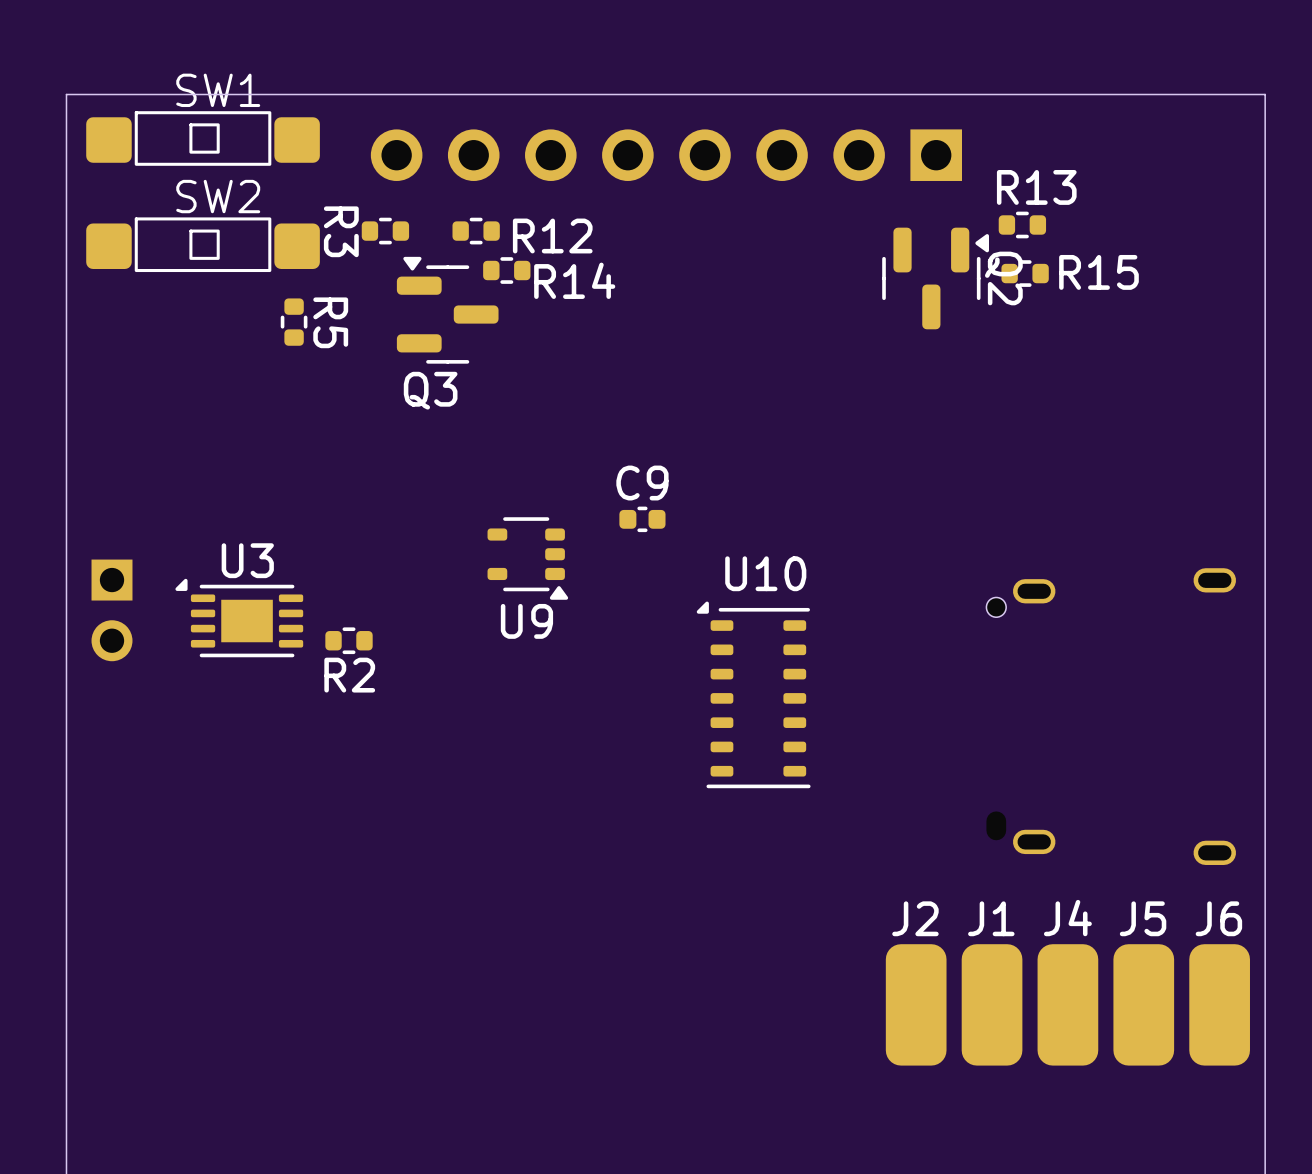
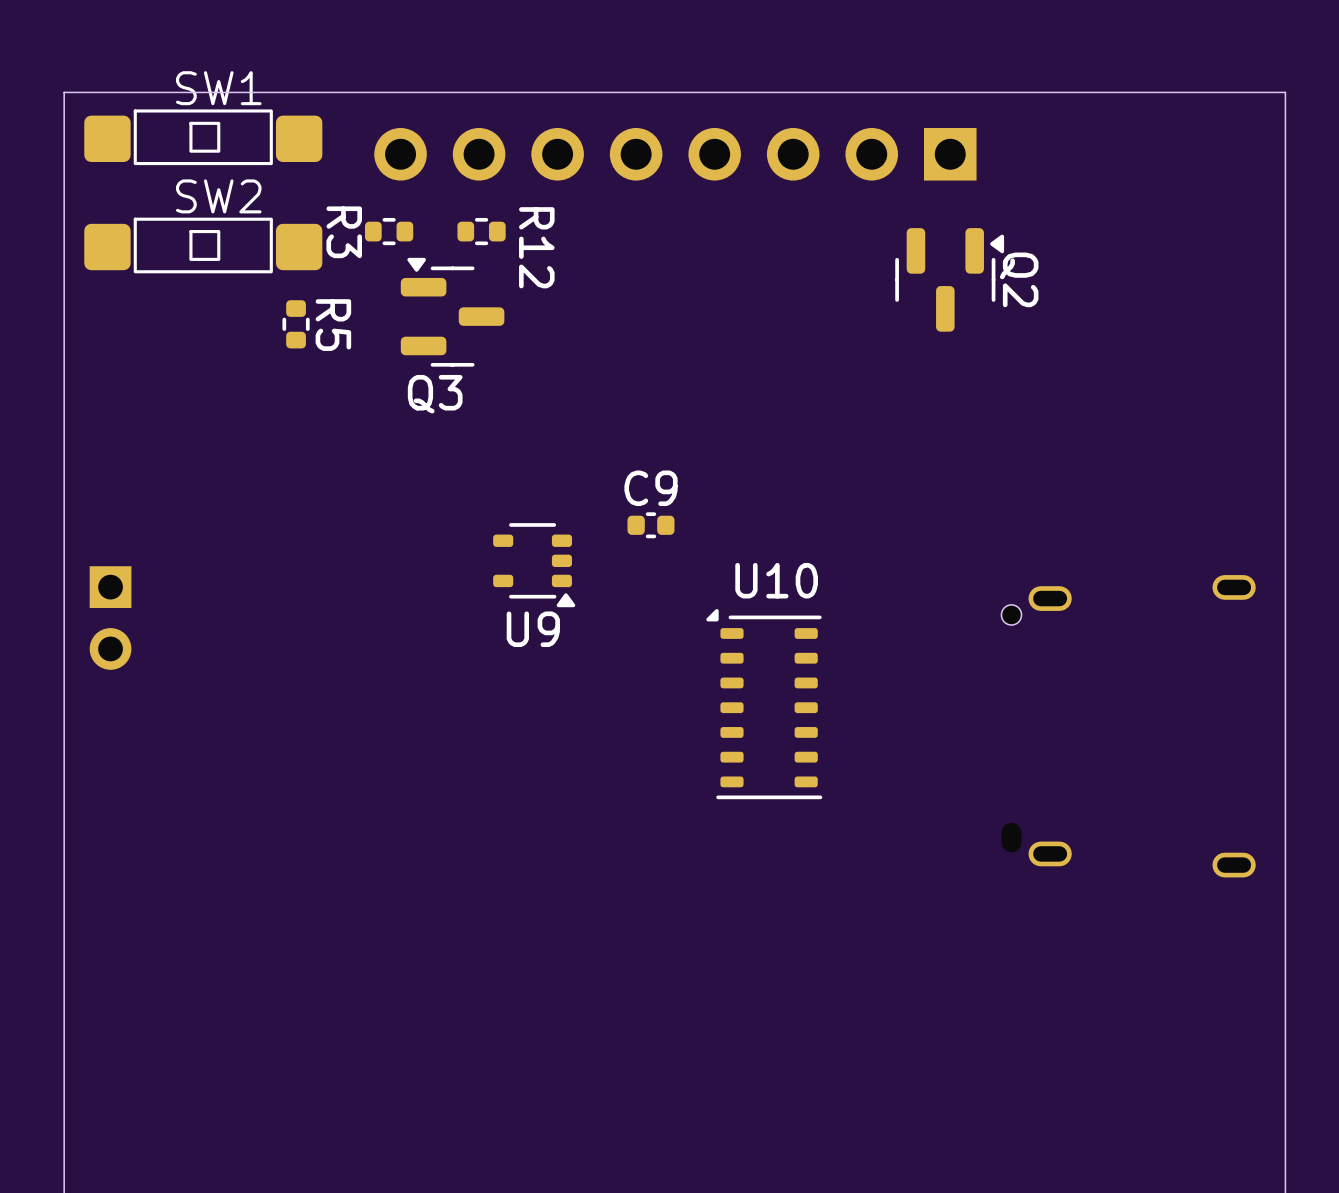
R13: (1022, 224) -> none
R12 name rotation: 0° (552, 235) -> 90° clockwise (536, 247)
R14: (506, 270) -> none
R15: (1025, 273) -> none
U3: (239, 618) -> none
R2: (349, 640) -> none
J2: (916, 1004) -> none
J1: (992, 1004) -> none
J4: (1067, 1004) -> none
J5: (1143, 1004) -> none
J6: (1219, 1004) -> none

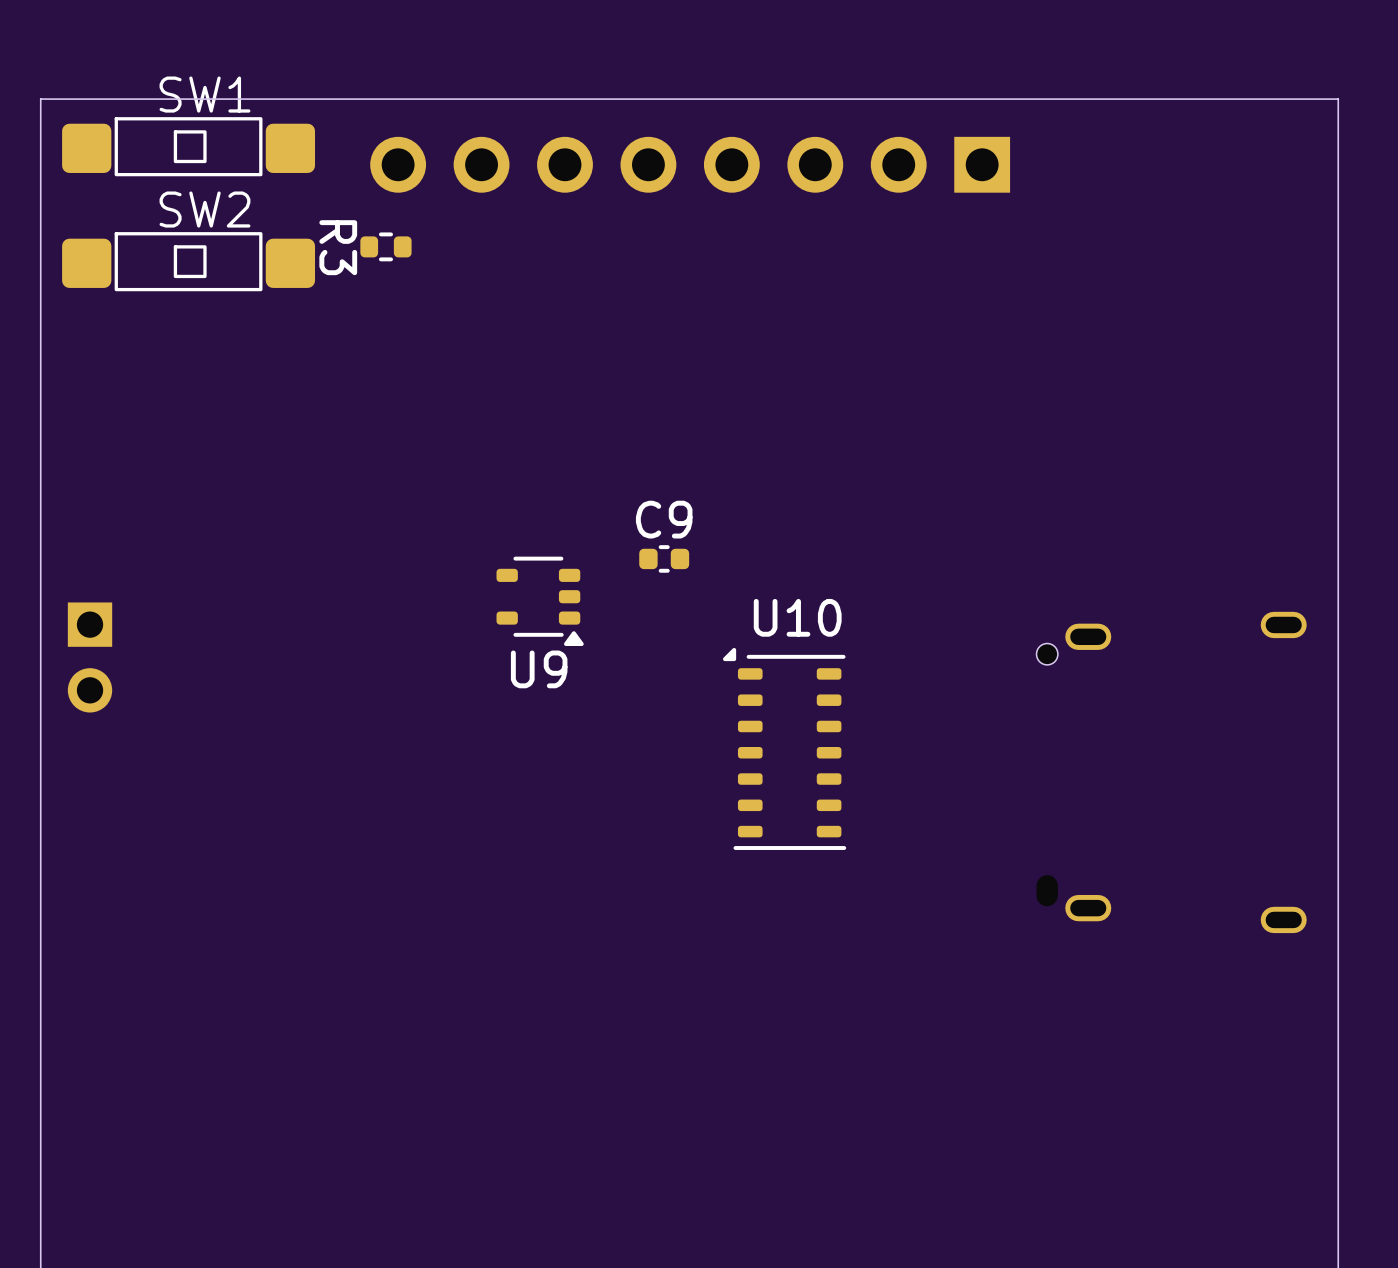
R12: (481, 231) -> none
Q2: (949, 279) -> none
Q3: (452, 312) -> none
R5: (296, 324) -> none

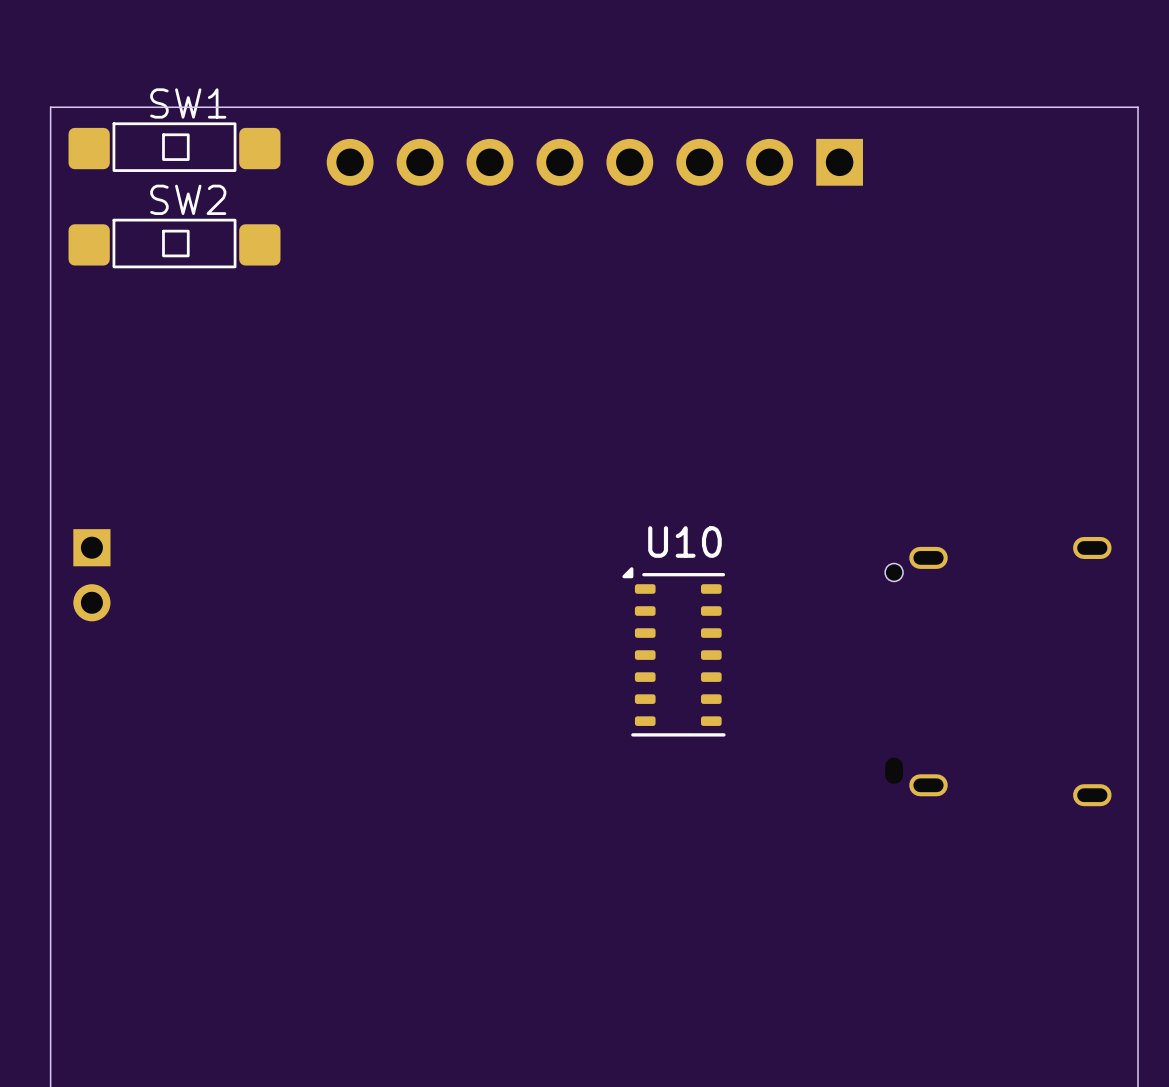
R3: (385, 246) -> none
C9: (664, 558) -> none
U9: (540, 601) -> none

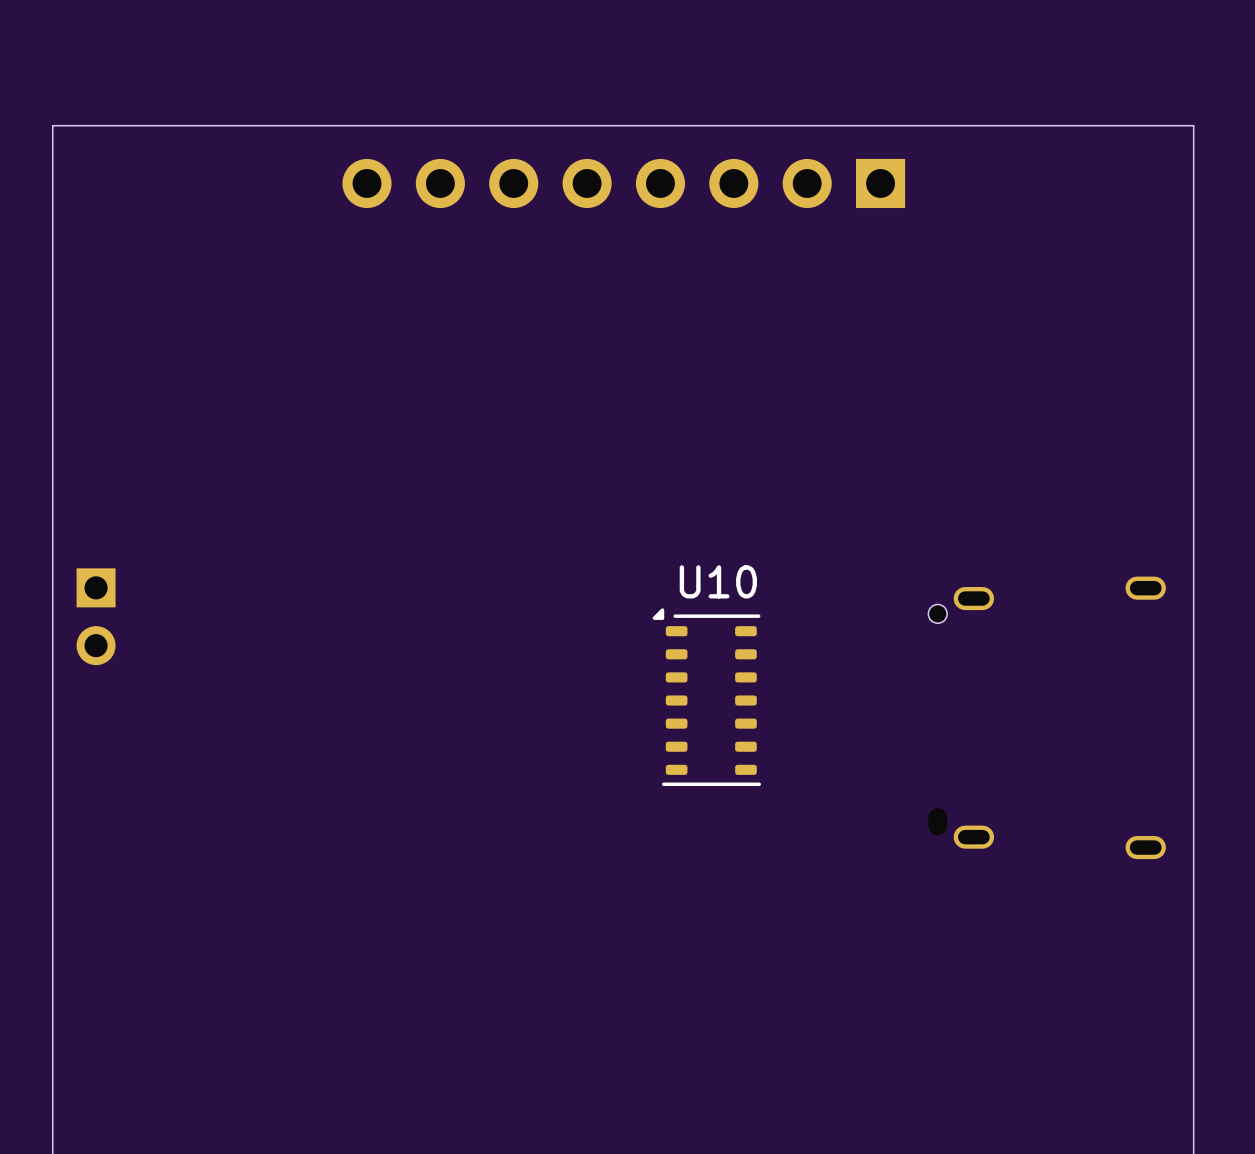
SW1: (174, 147) -> none
SW2: (174, 243) -> none

